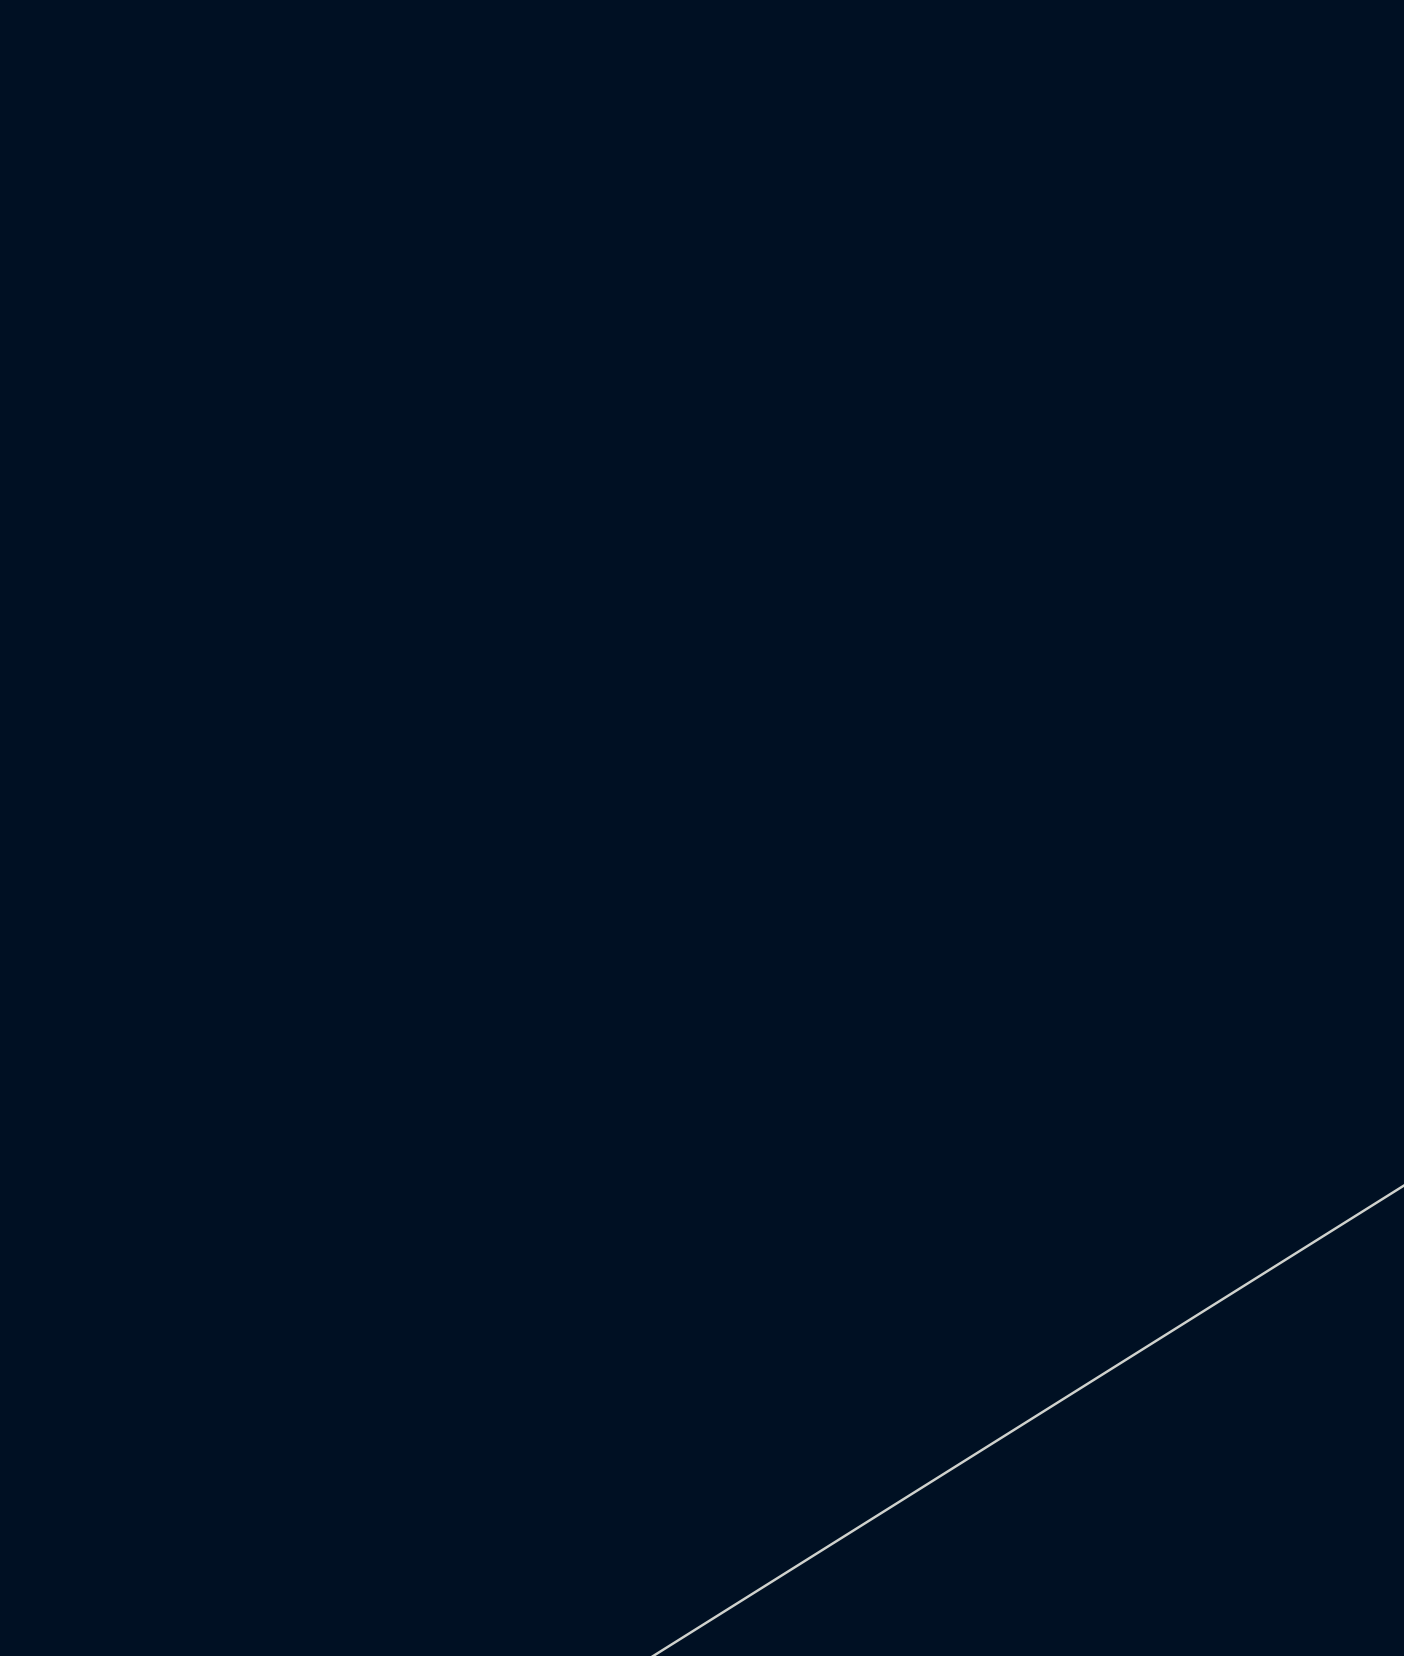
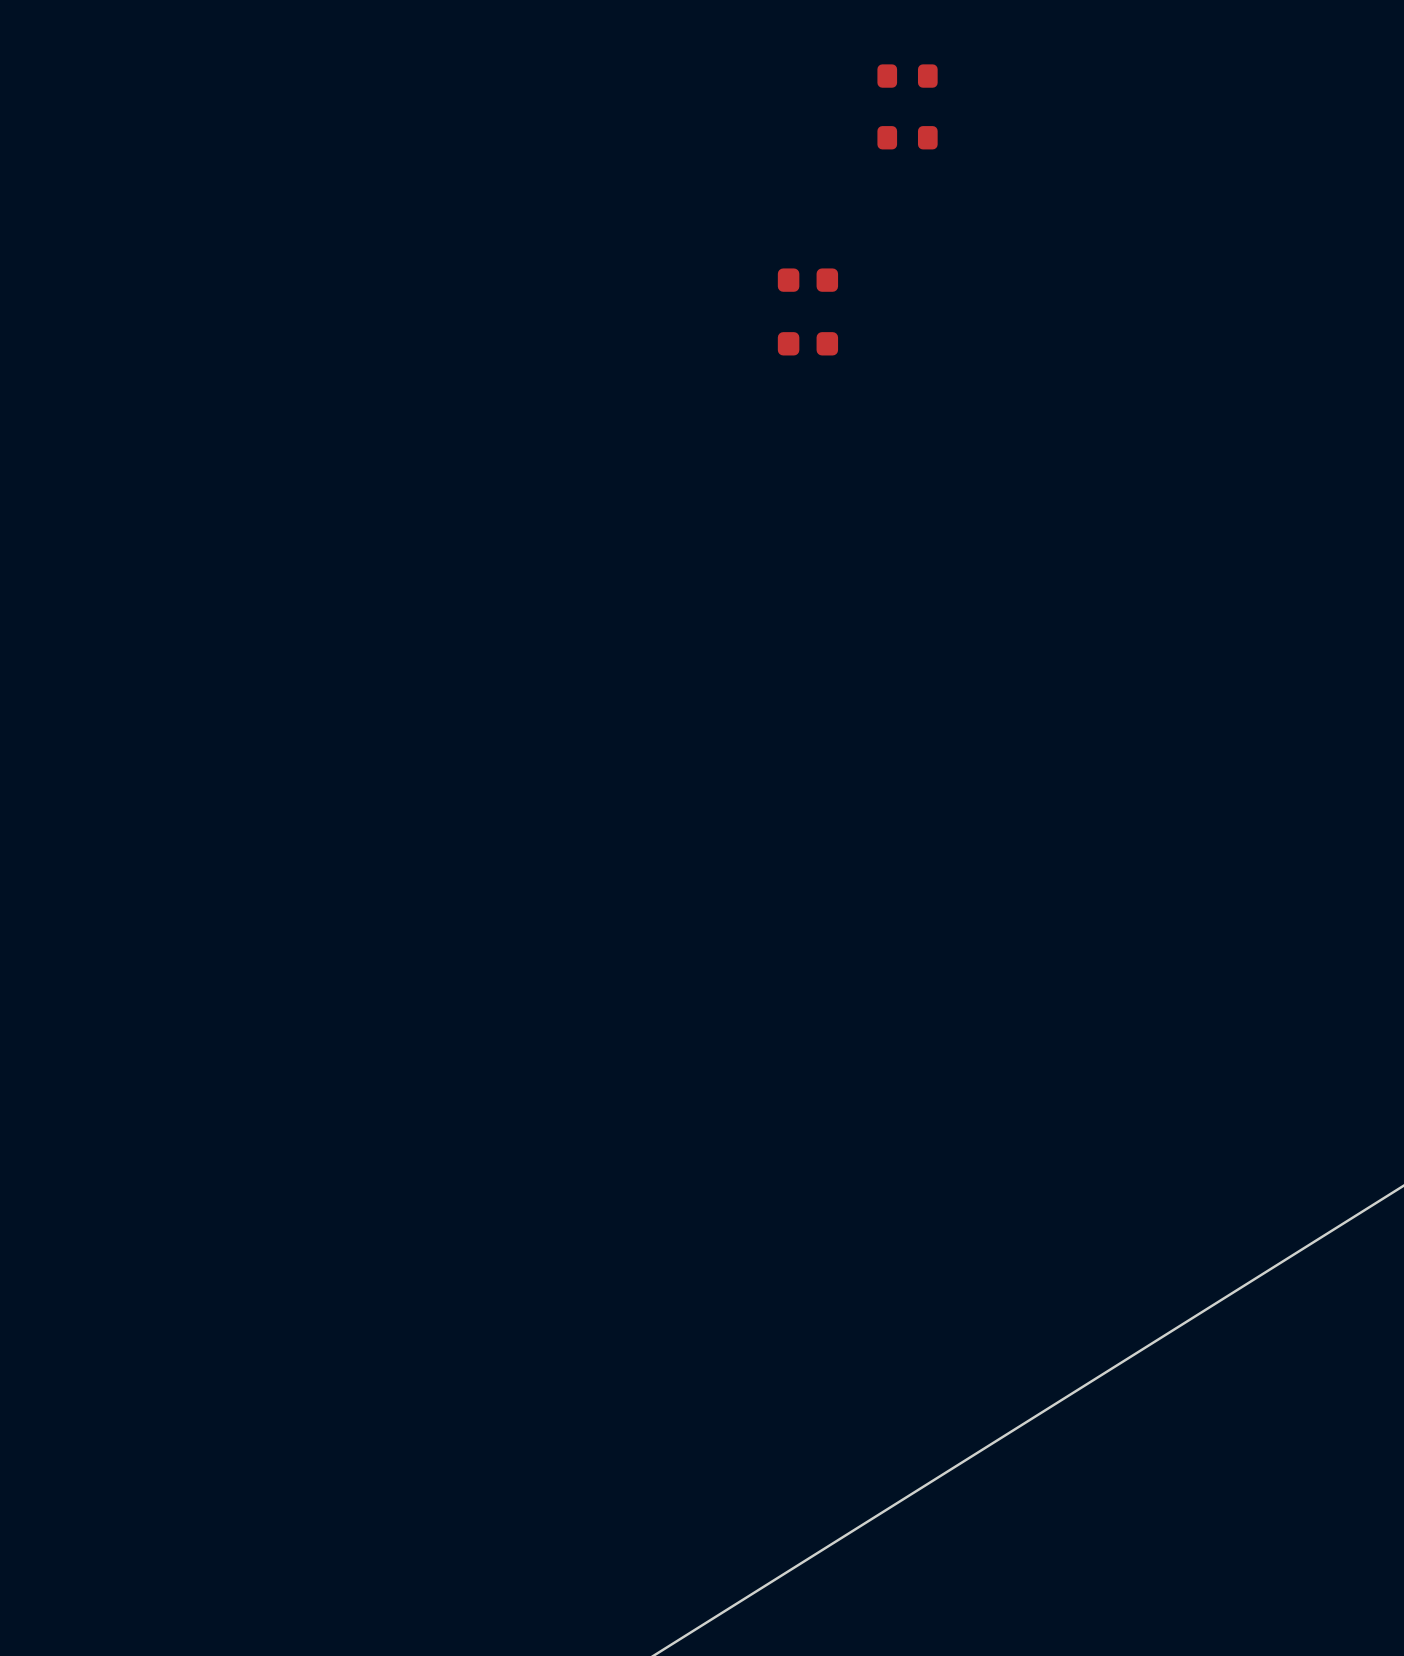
part: none -> (907, 76)
part: none -> (907, 137)
part: none -> (807, 280)
part: none -> (807, 343)

